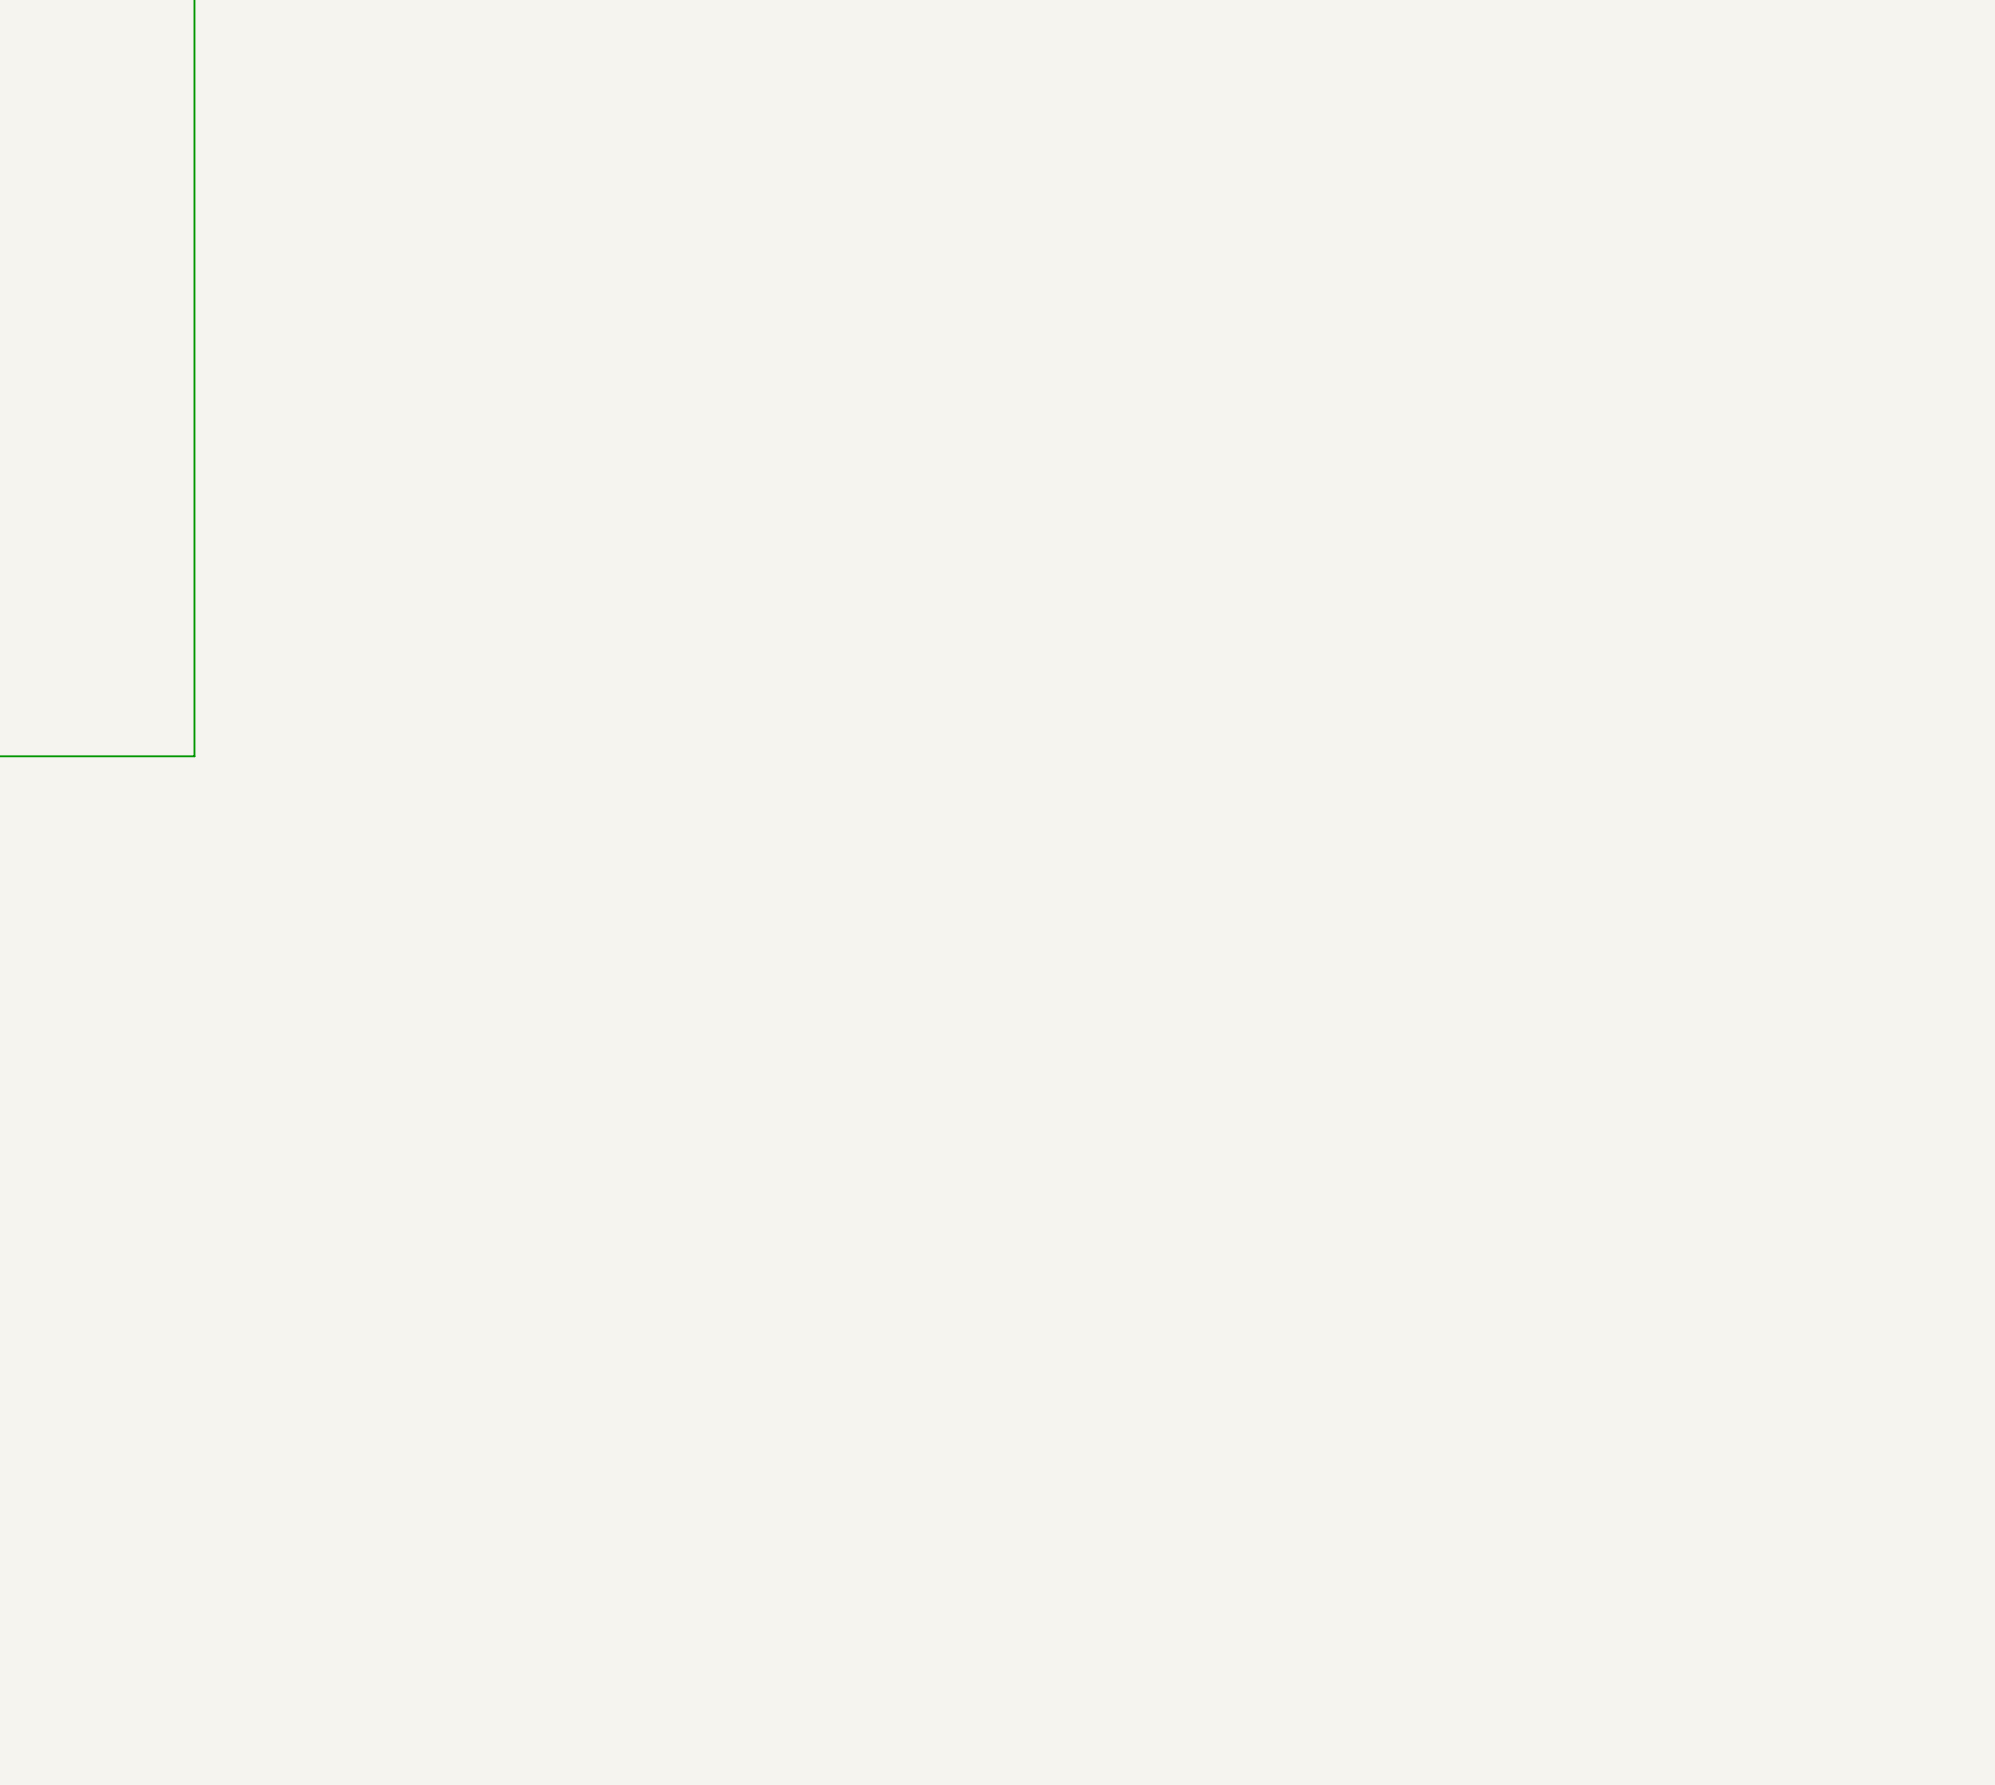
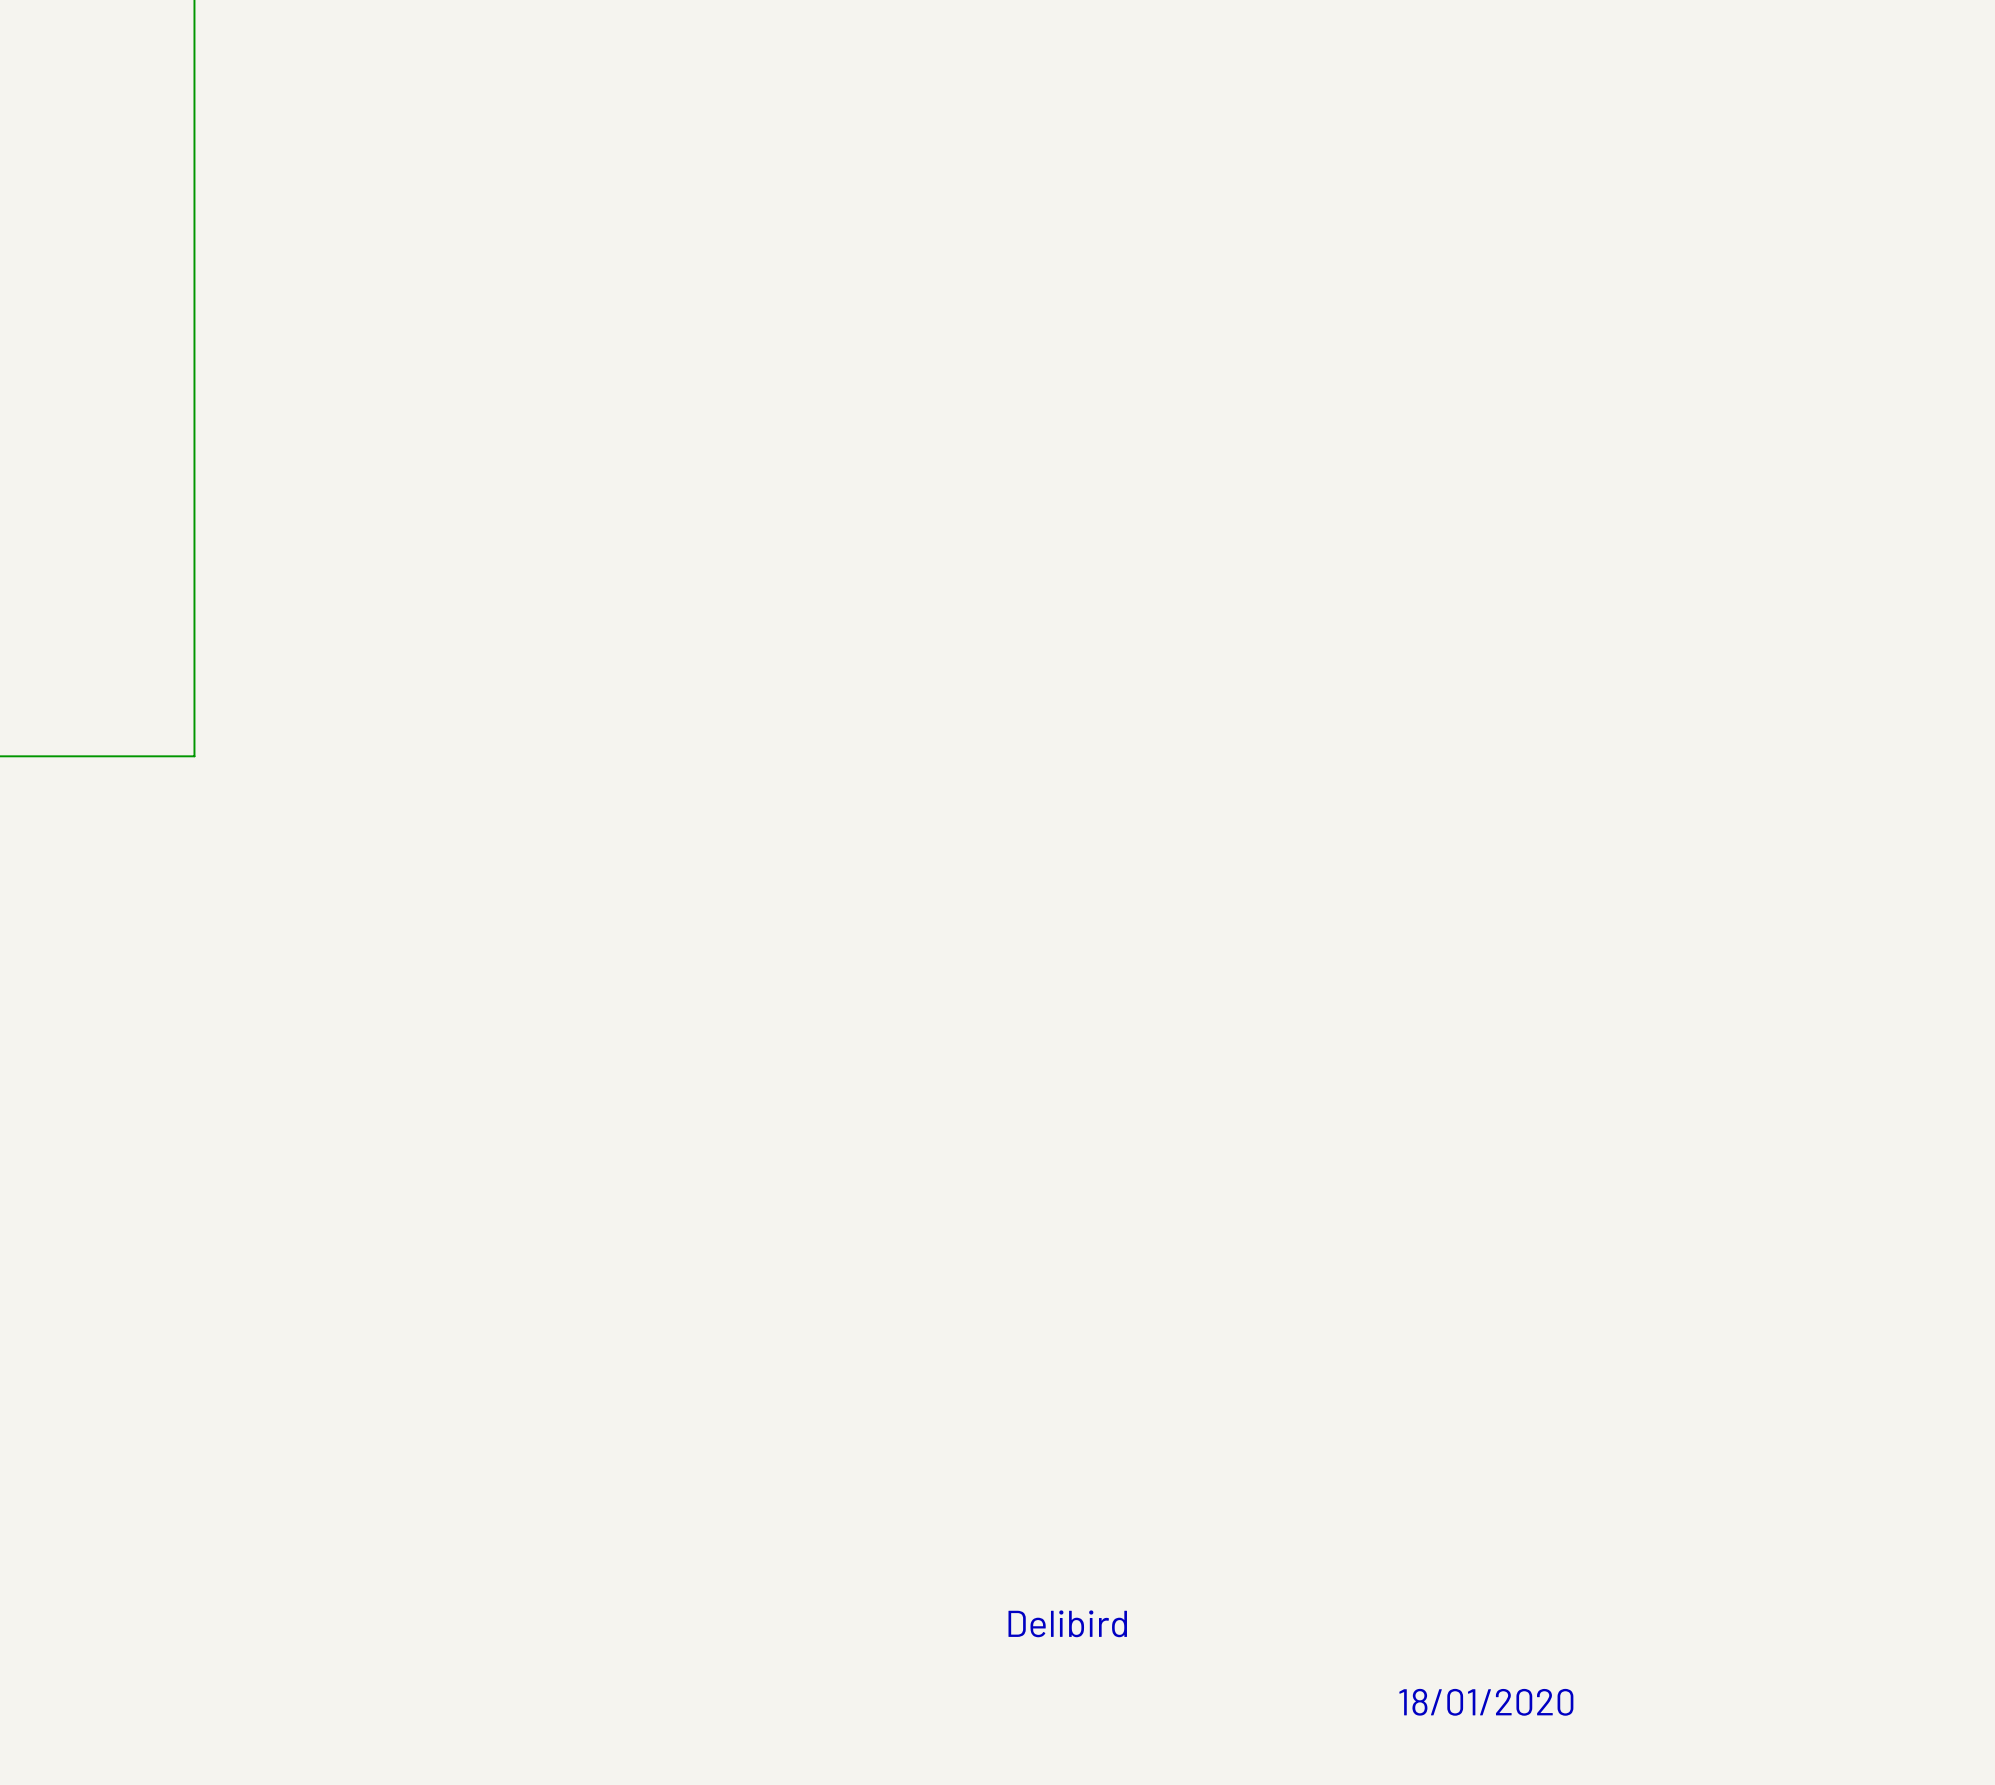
text: none -> Delibird (1067, 1623)
text: none -> 18/01/2020 (1486, 1702)

